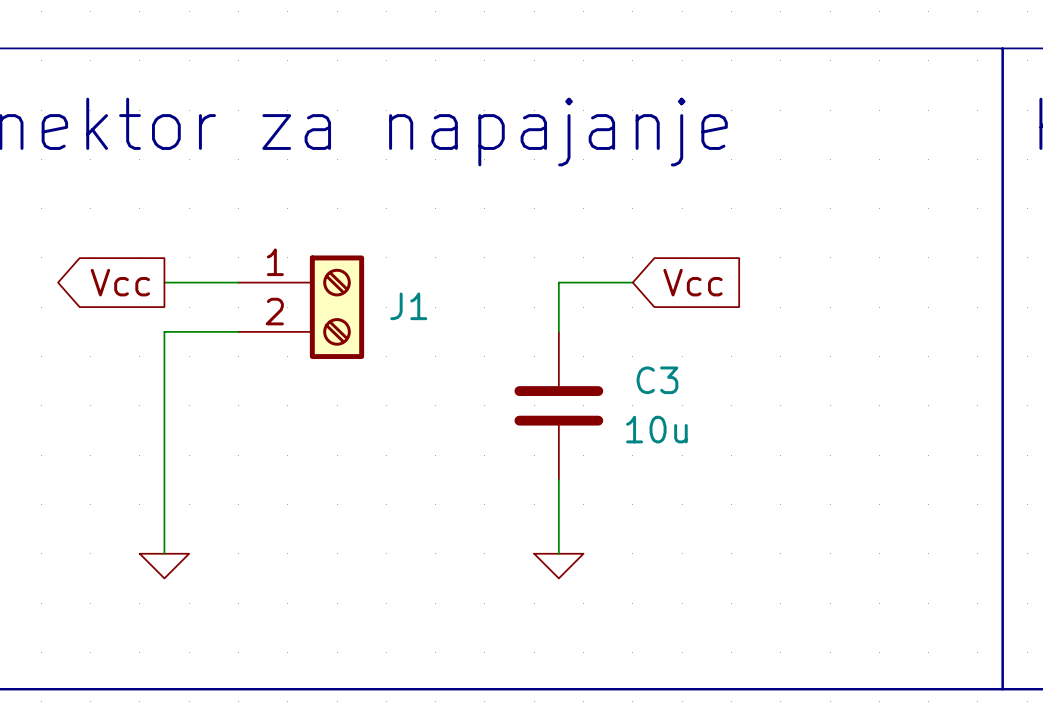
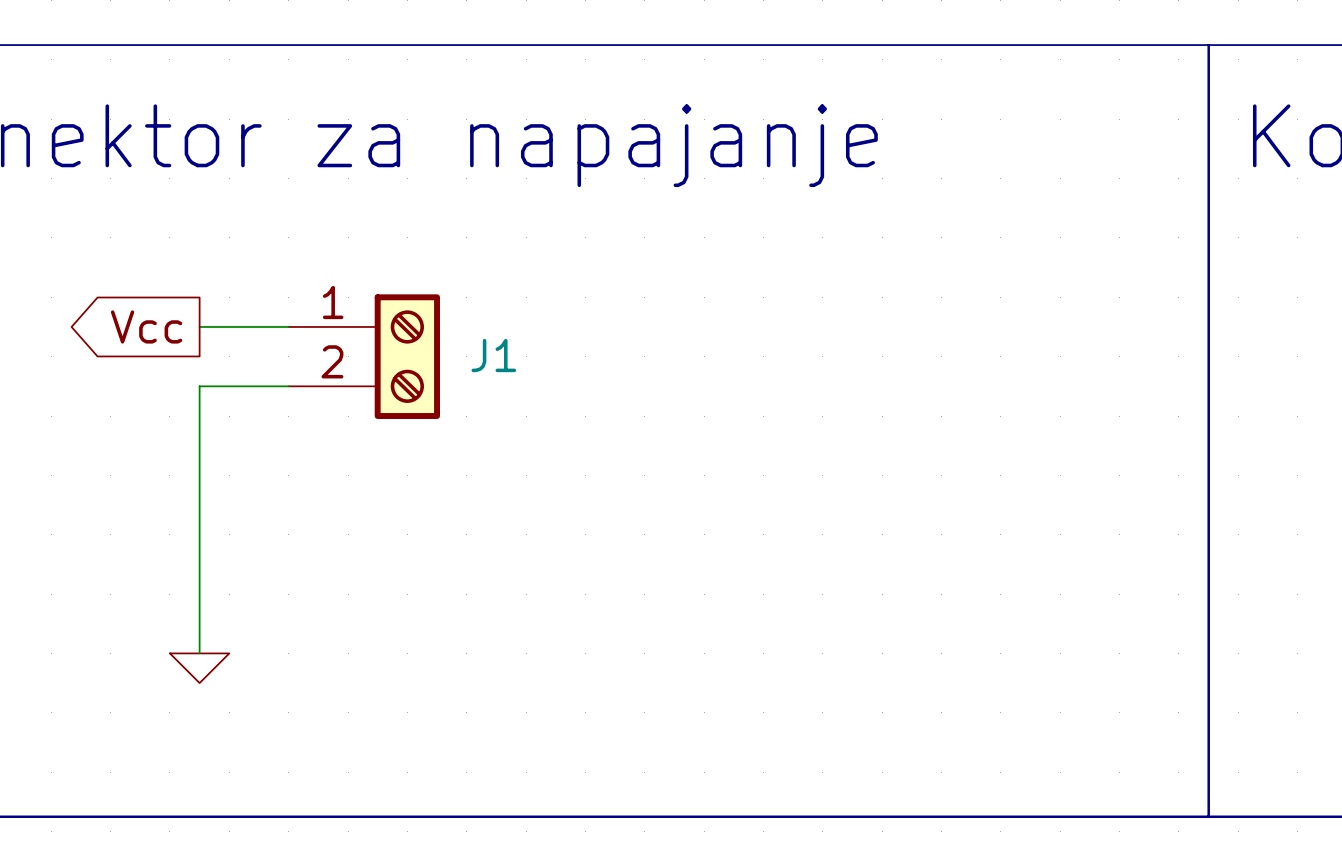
wire: (632, 282) (558, 282) (558, 331) -> none
global label: Vcc (693, 282) -> none
C3: 10u (558, 405) -> none
wire: (558, 479) (558, 553) -> none
power symbol: (558, 566) -> none

